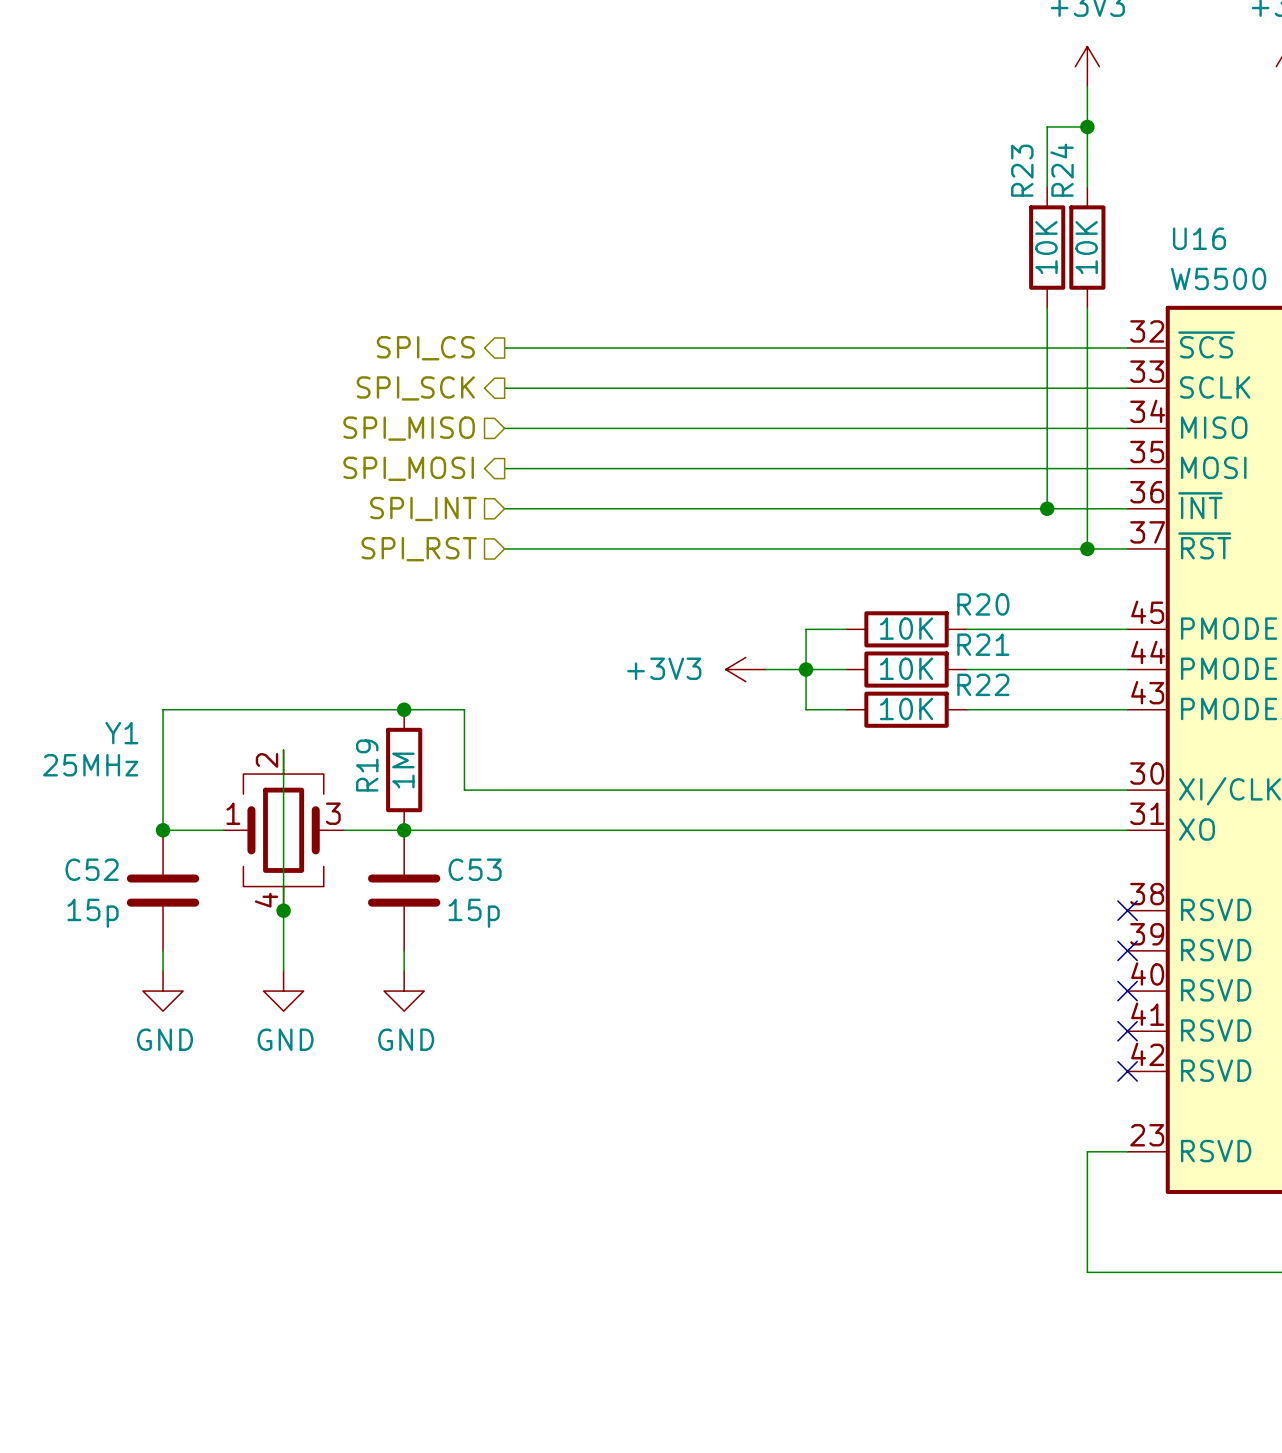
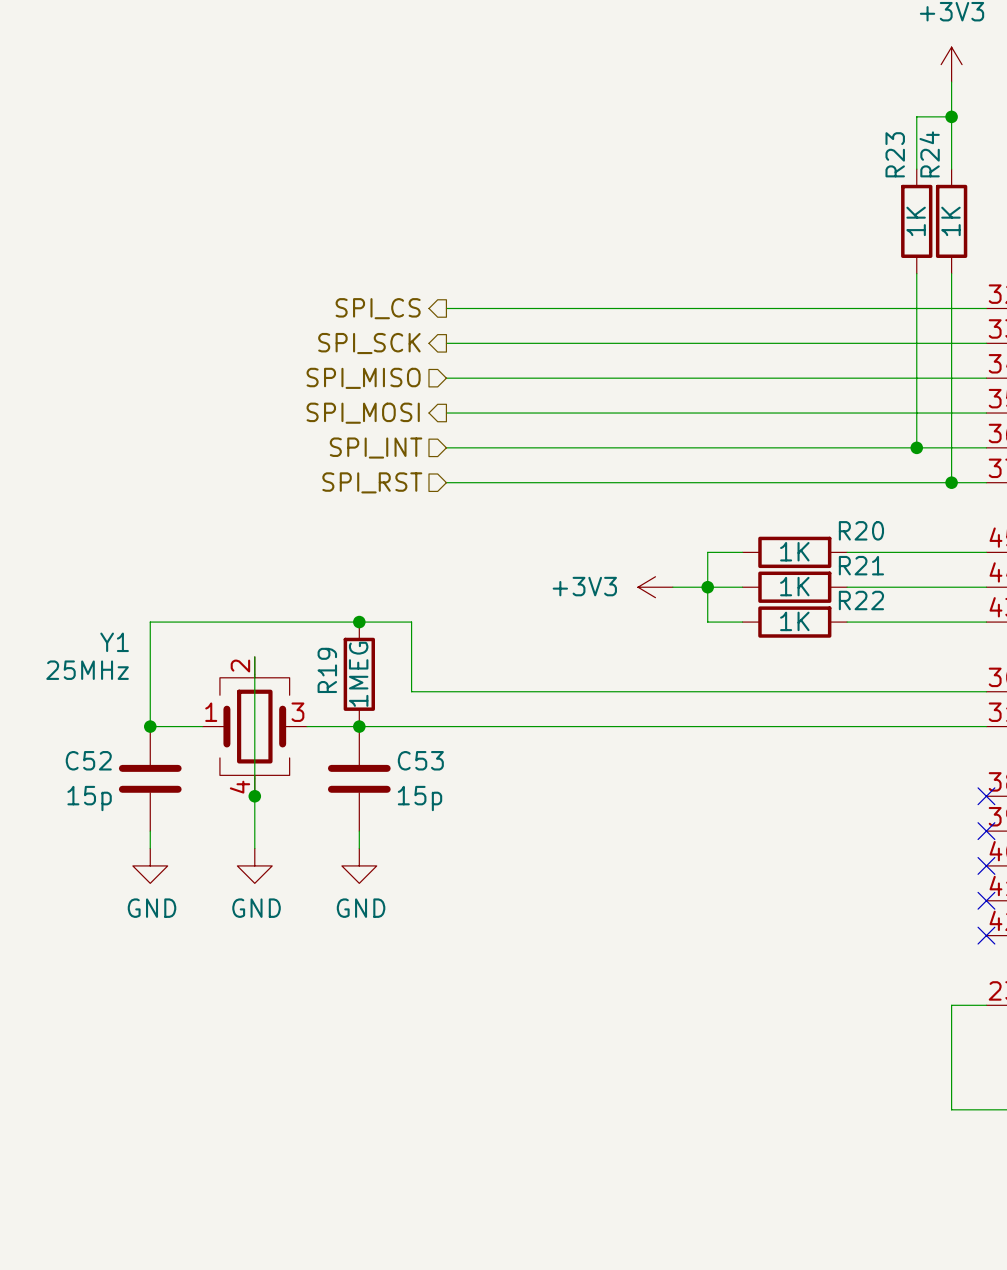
R23 value: 10K (1046, 247) -> 1K (916, 221)
R24 value: 10K (1086, 247) -> 1K (950, 221)
R20 value: 10K (906, 628) -> 1K (794, 551)
R21 value: 10K (906, 668) -> 1K (794, 586)
R22 value: 10K (906, 708) -> 1K (794, 621)
R19 value: 1M (403, 770) -> 1MEG (358, 674)

